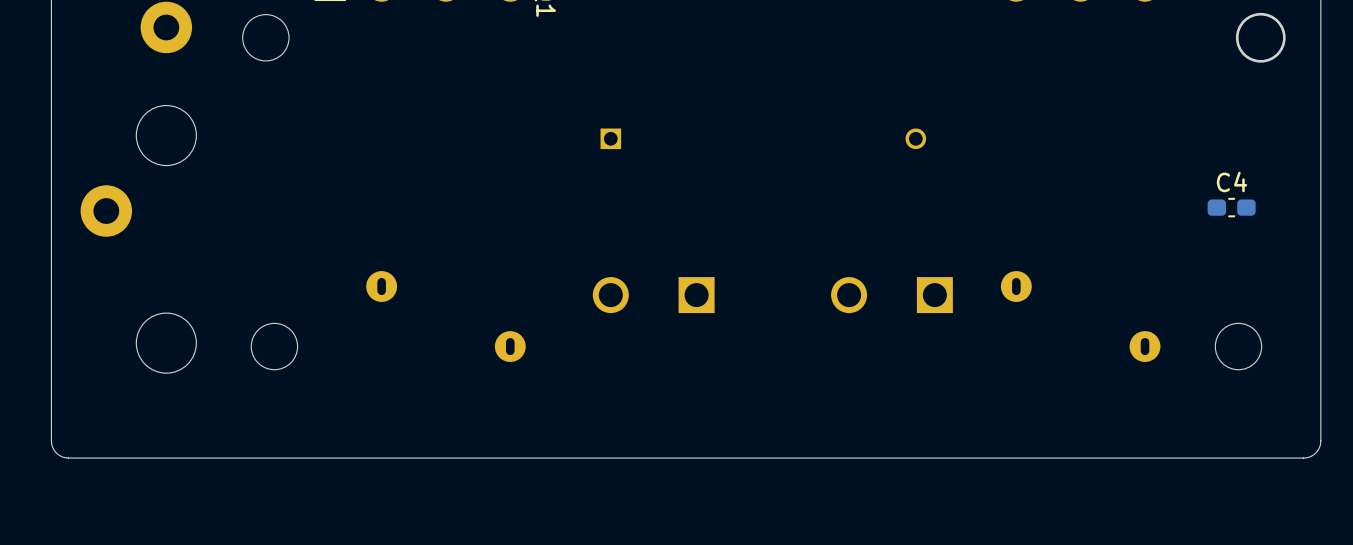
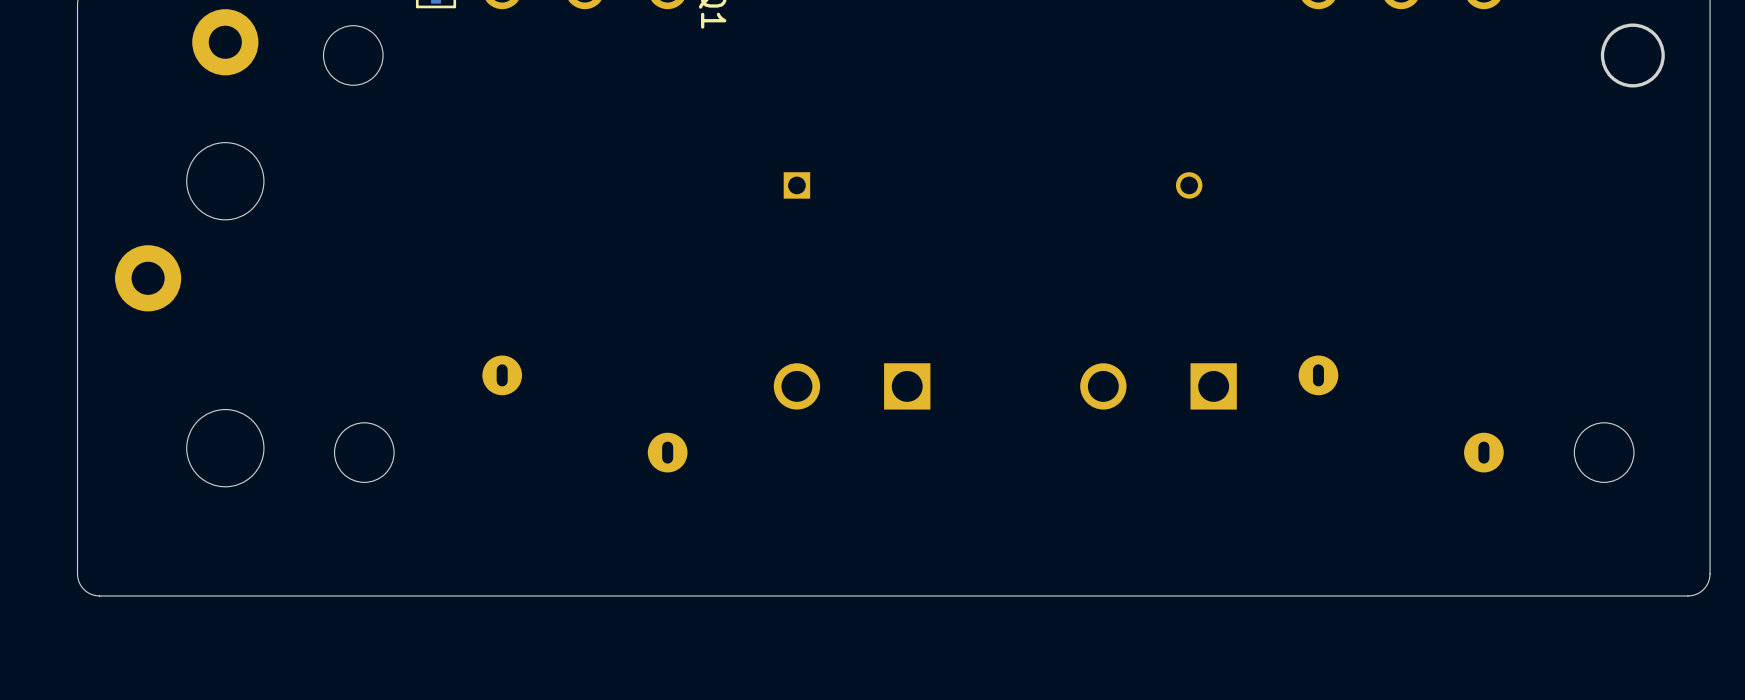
C4: (1231, 207) -> none

